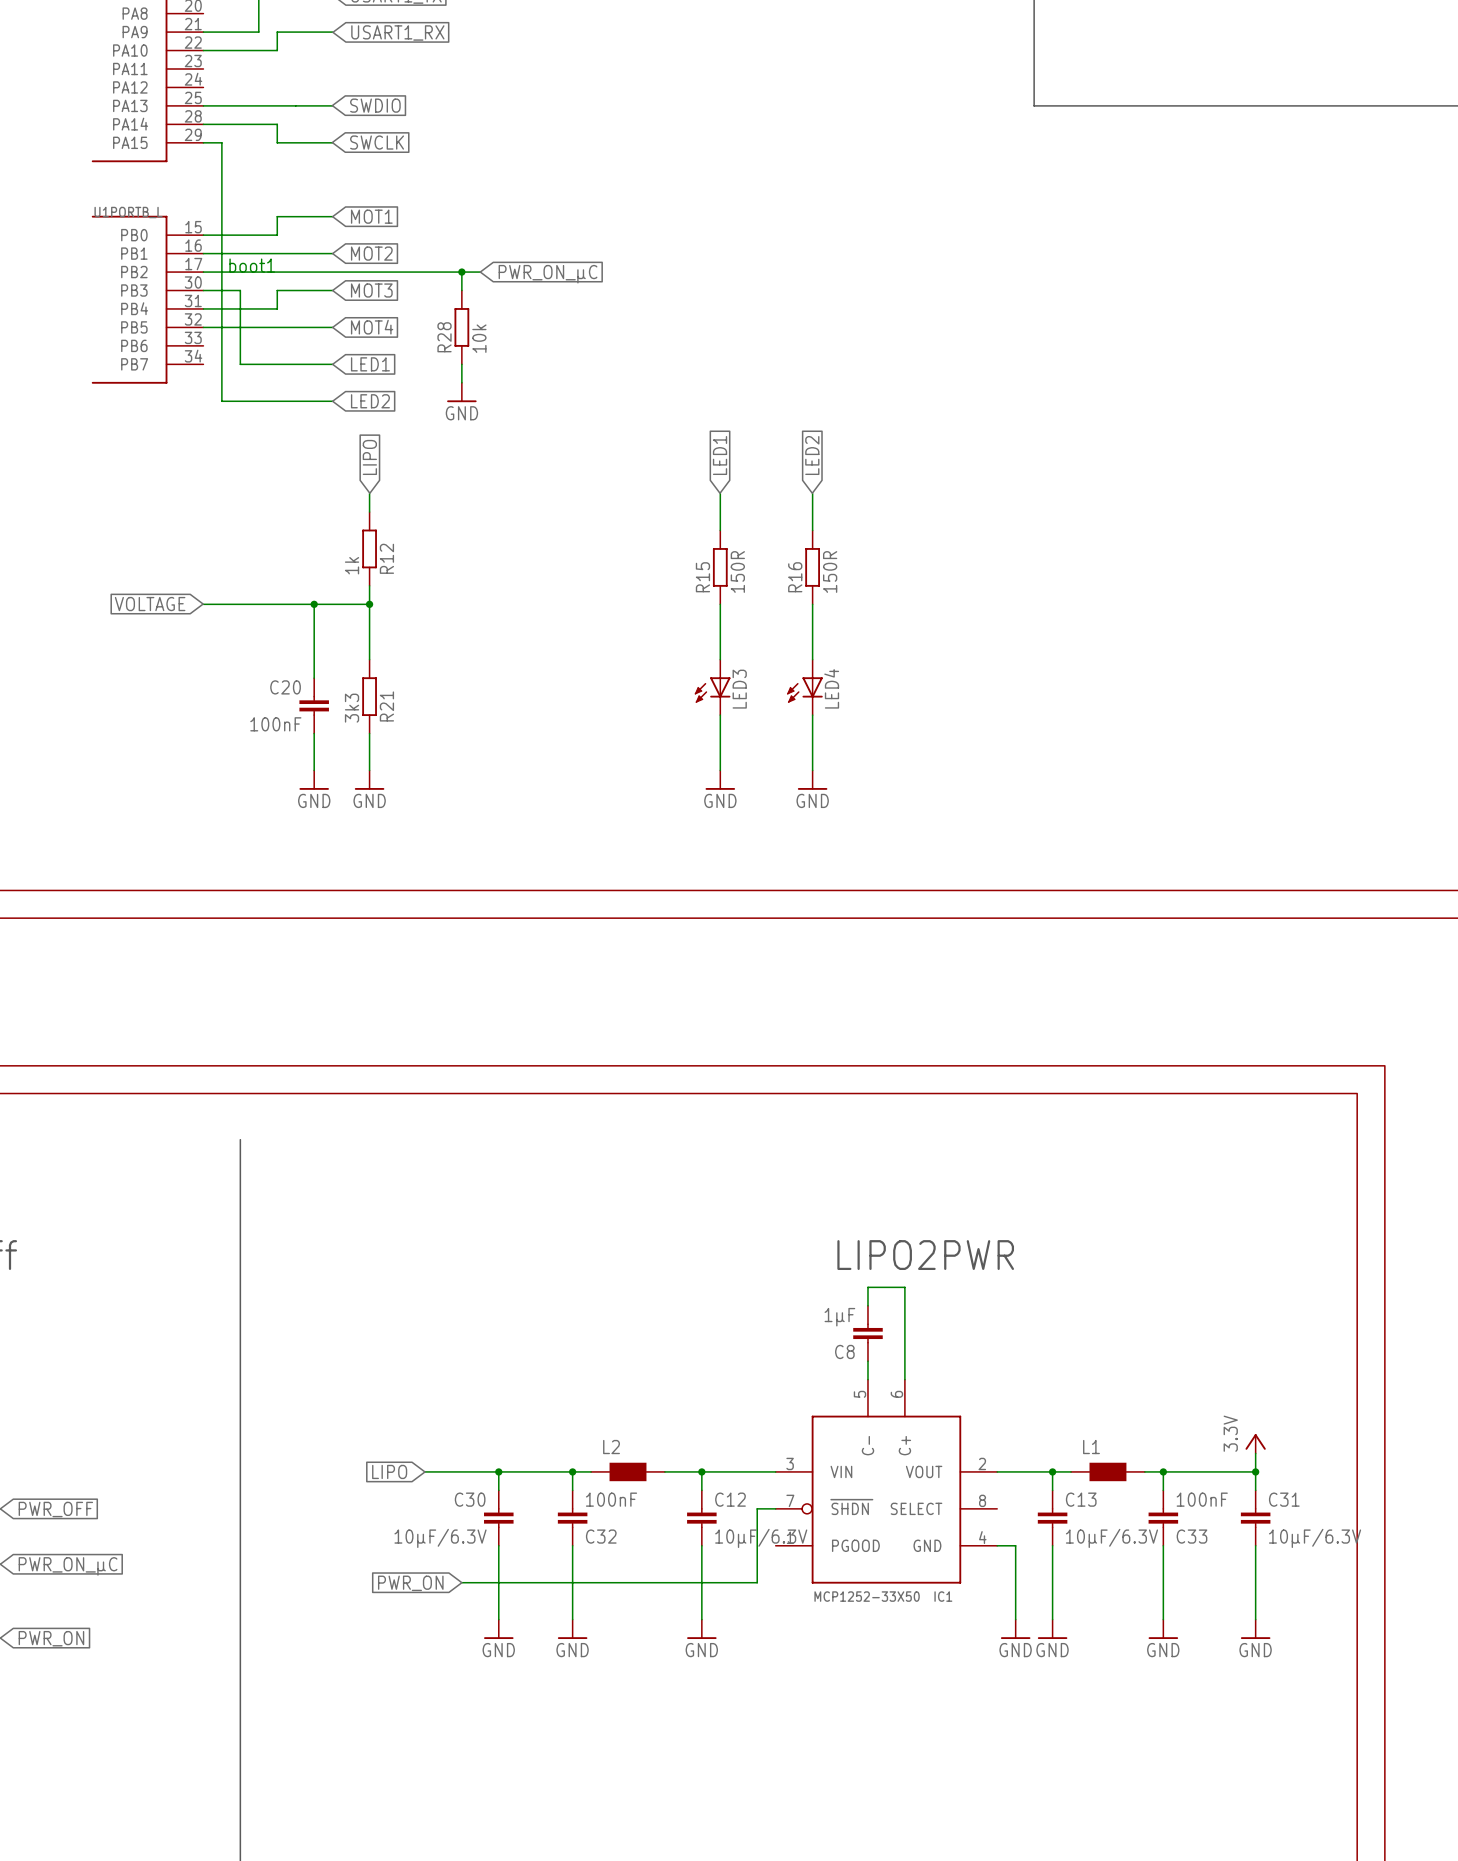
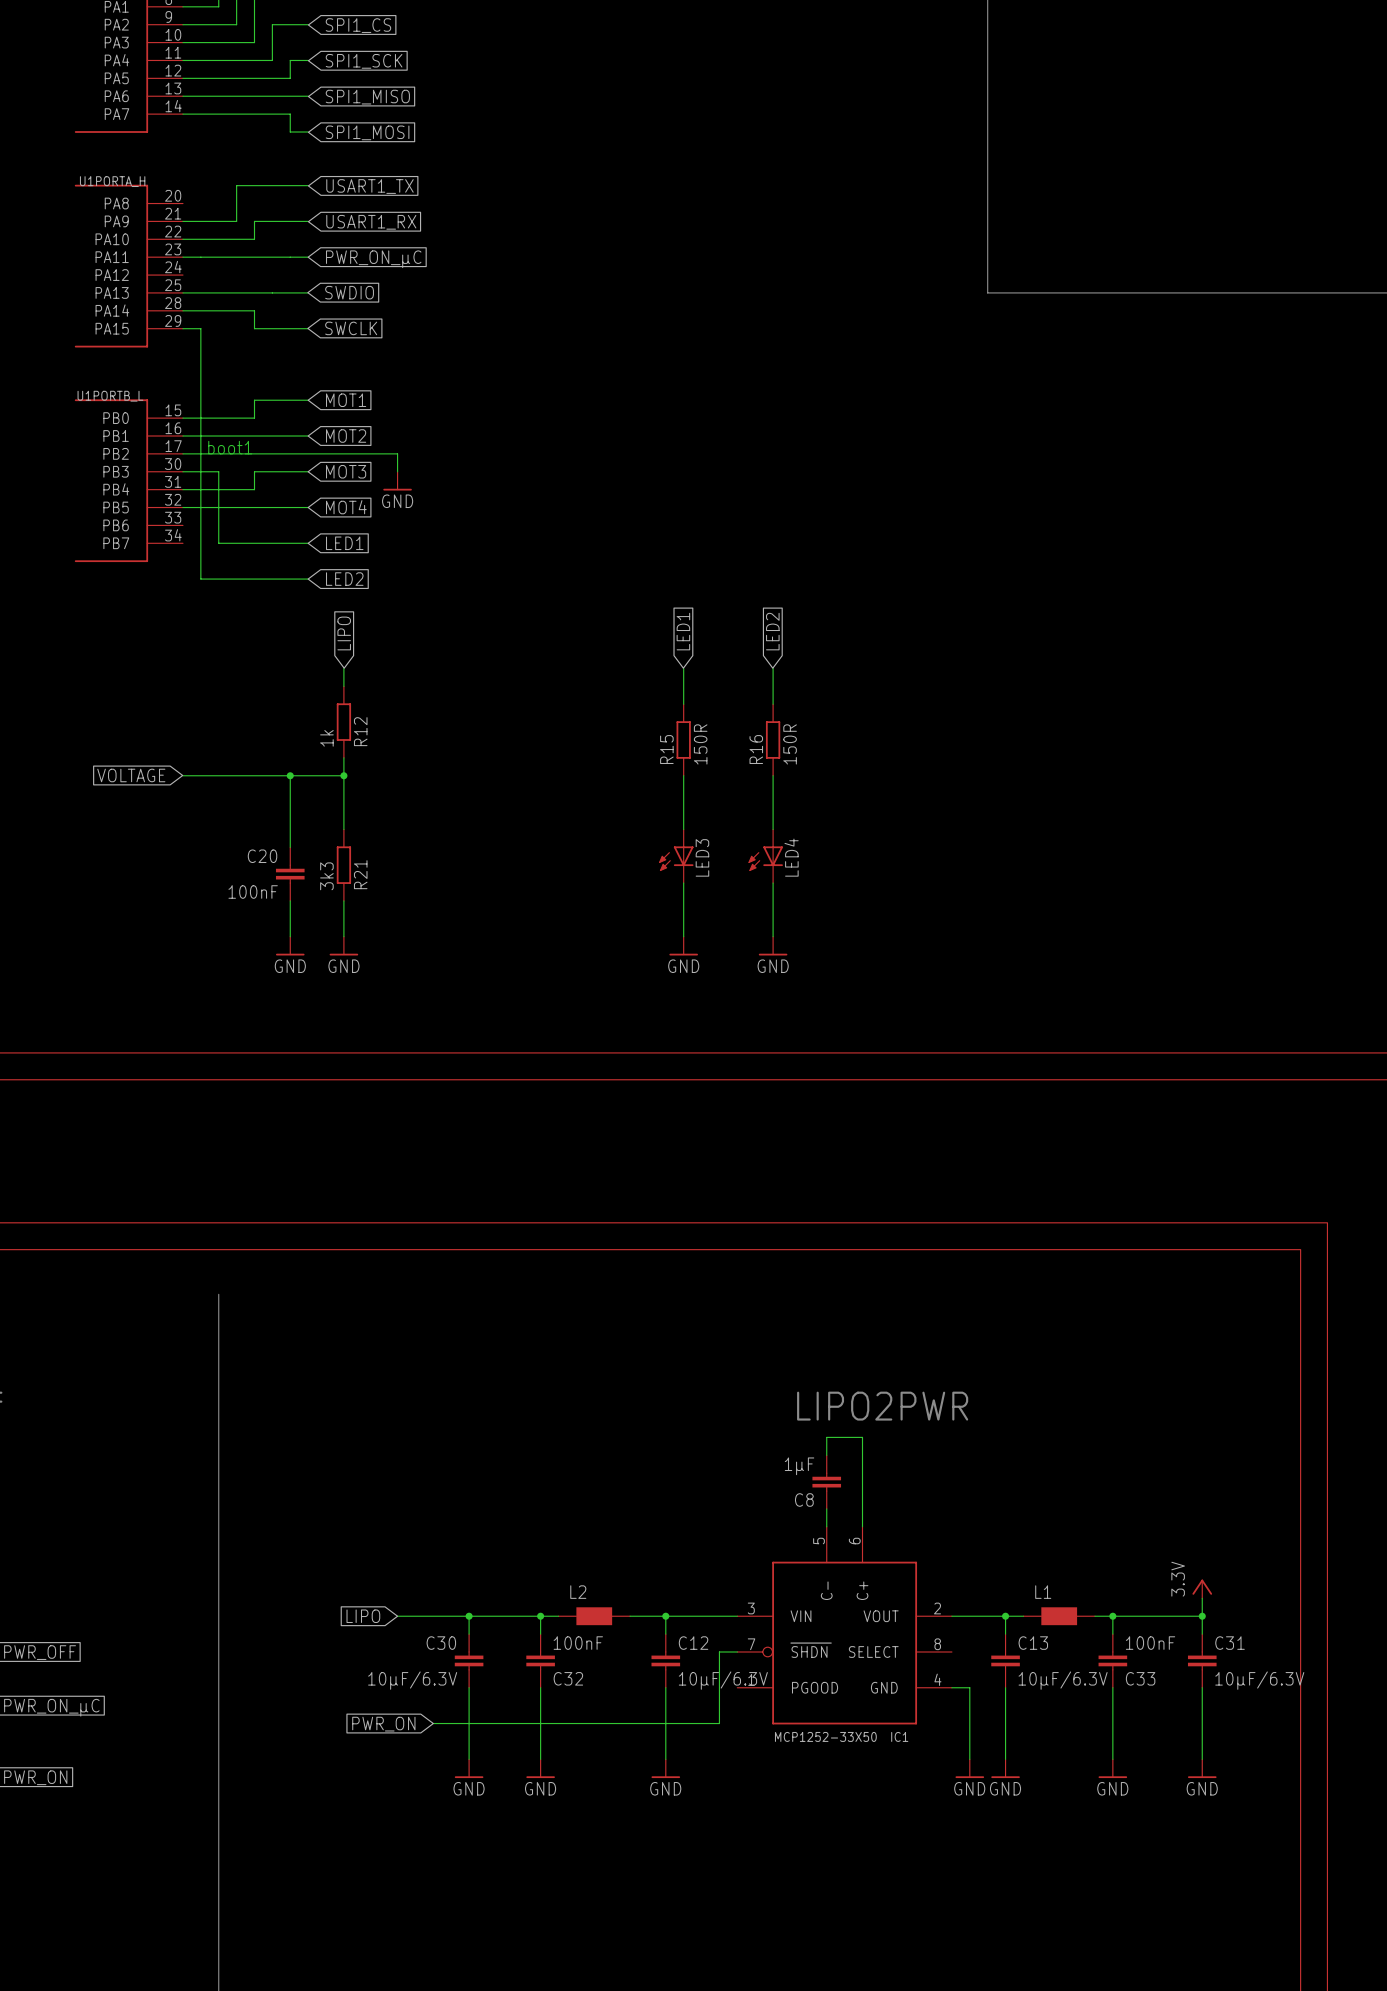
wire: none -> (182, 257) (308, 257)
global label: none -> PWR_ON_µC (373, 259)
wire: (424, 272) (480, 272) -> (397, 453) (397, 471)
wire: (461, 272) (461, 290) -> none
junction: (461, 272) -> none
global label: PWR_ON_µC (548, 274) -> none
R28: 10k (461, 327) -> none
wire: (461, 364) (461, 382) -> none
power symbol position: GND (461, 392) -> GND (397, 481)

